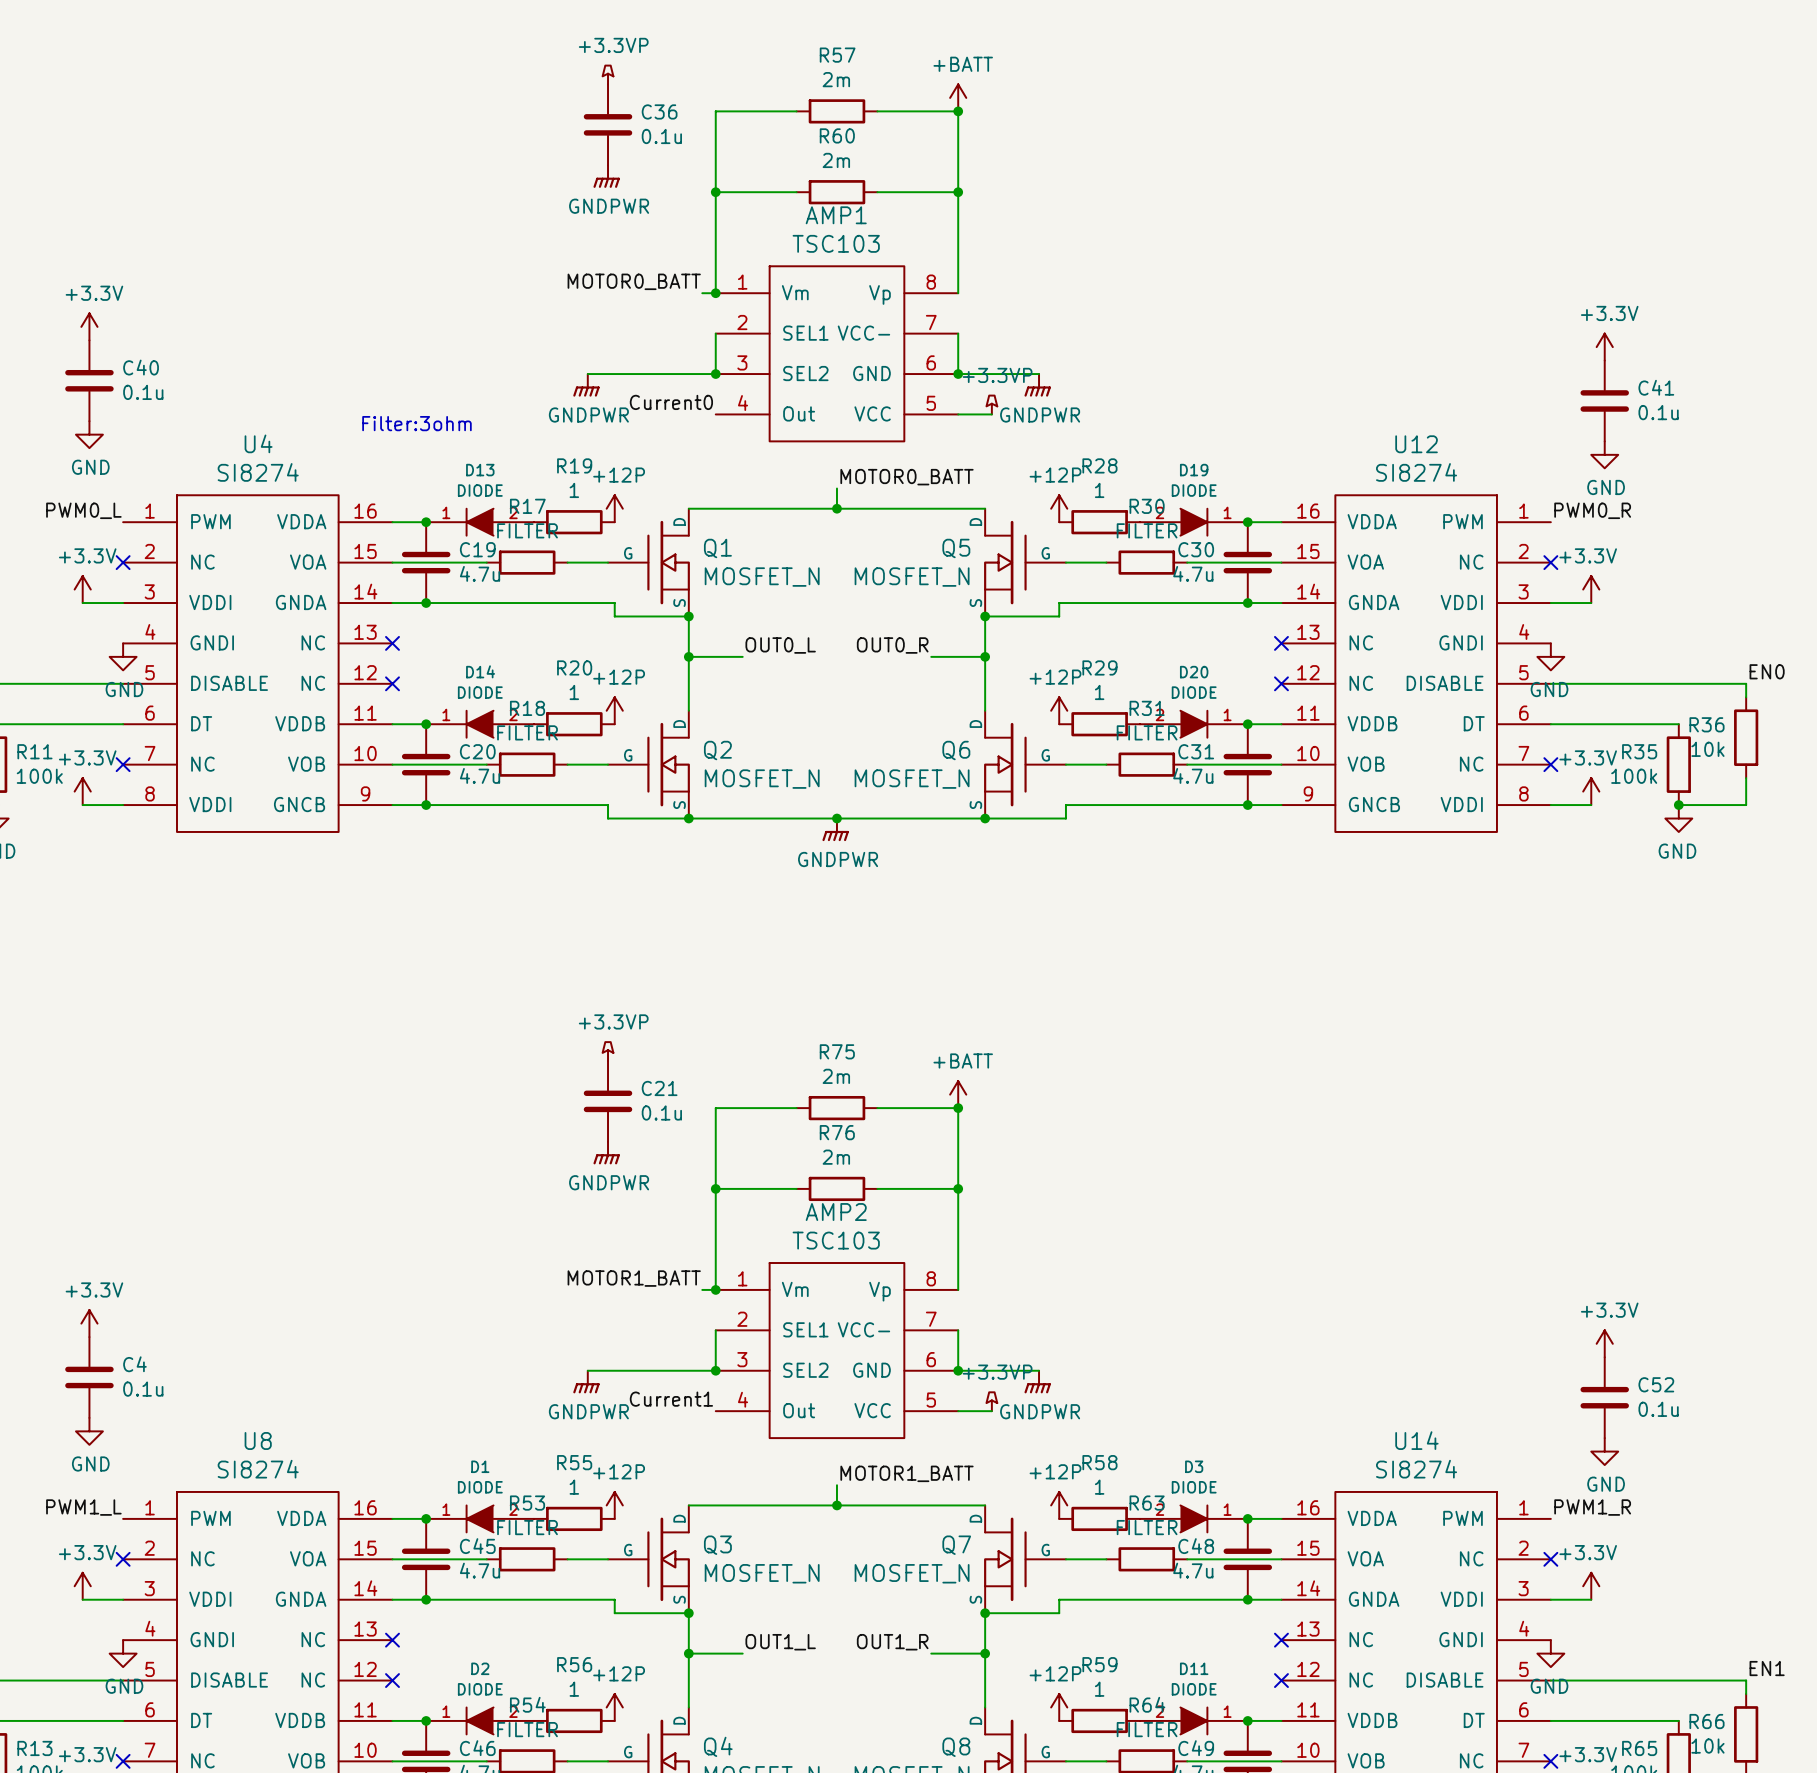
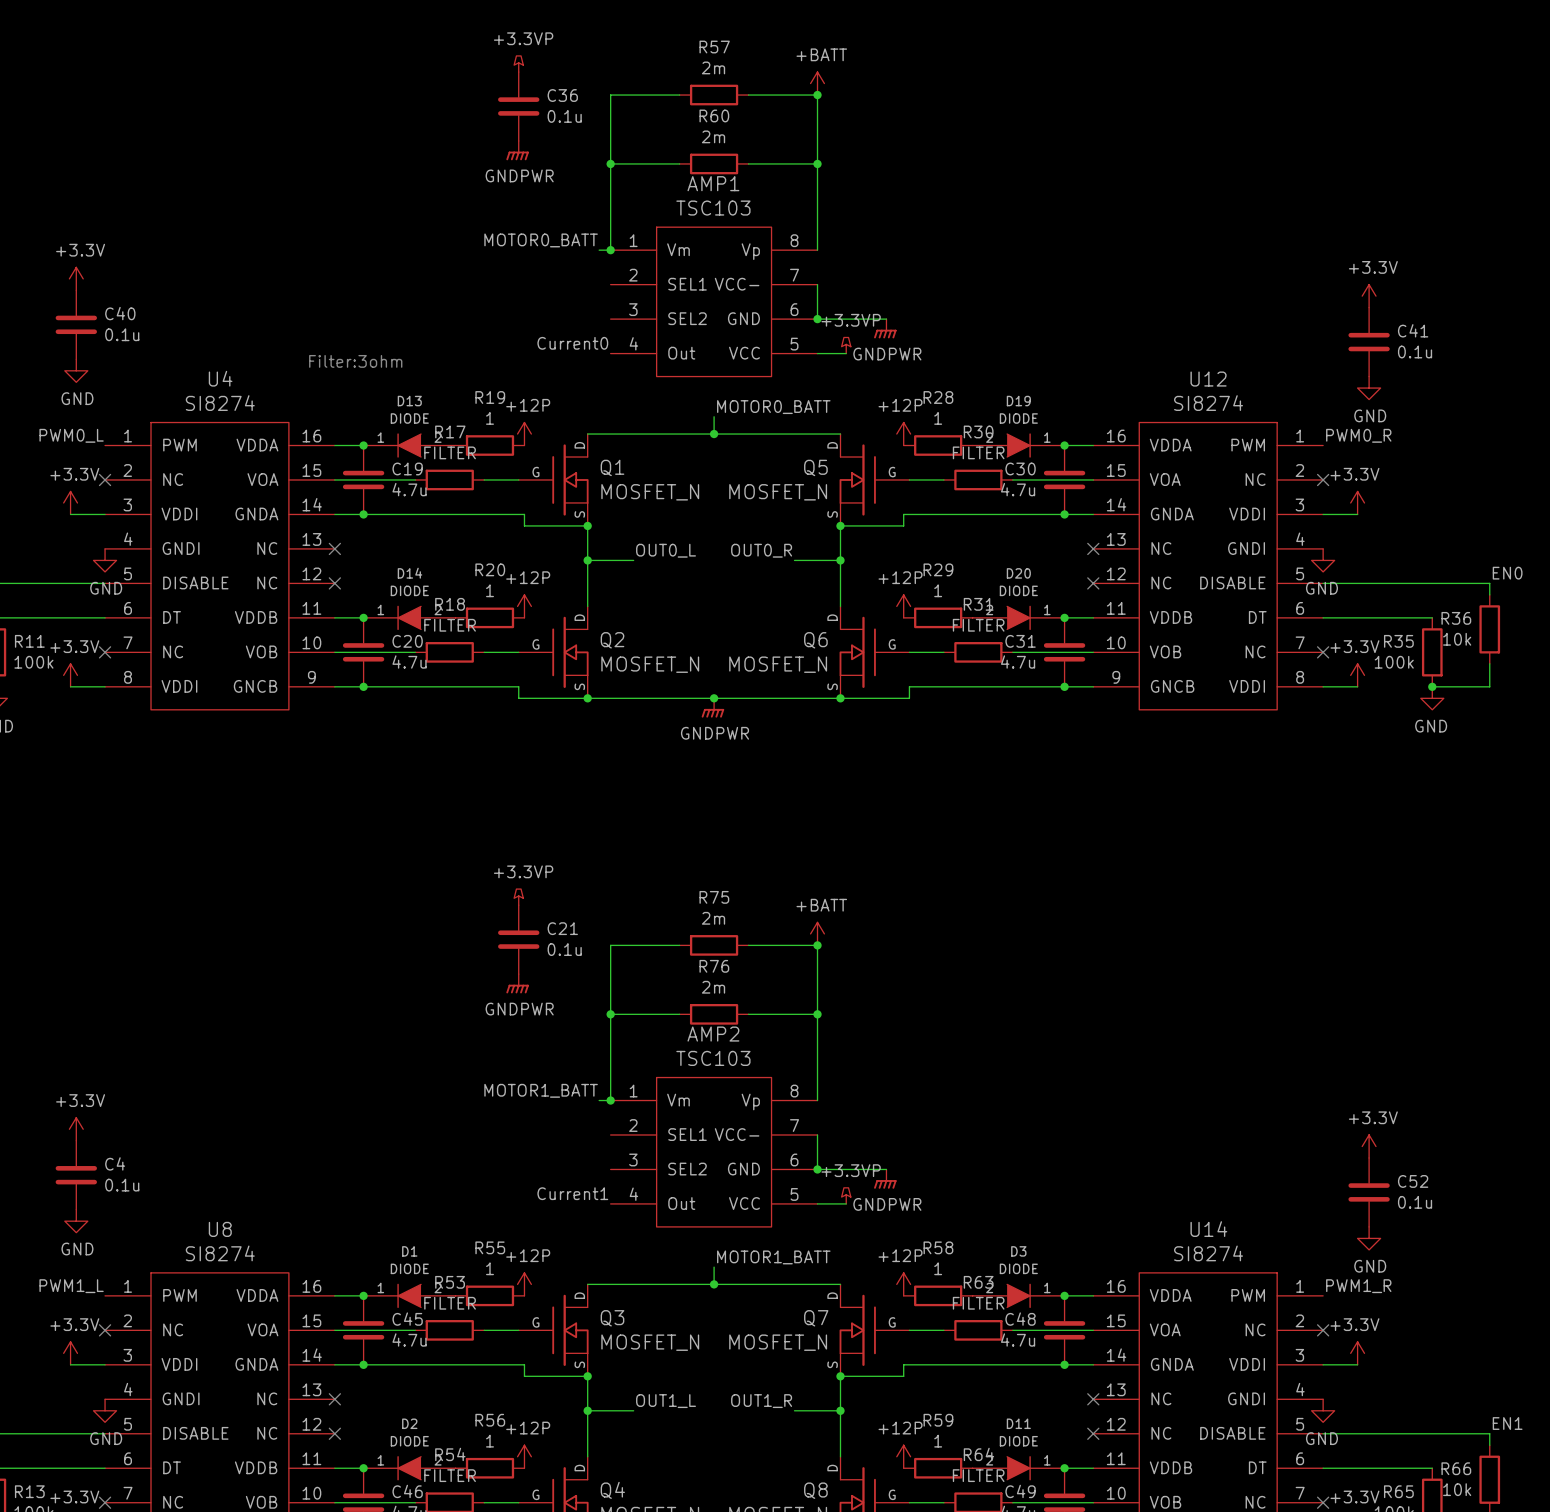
wire: (715, 333) (715, 374) (587, 374) -> none
junction: (715, 374) -> none
power symbol: GNDPWR (586, 385) -> none
wire: (715, 1330) (715, 1370) (587, 1370) -> none
junction: (715, 1370) -> none
power symbol: GNDPWR (586, 1382) -> none

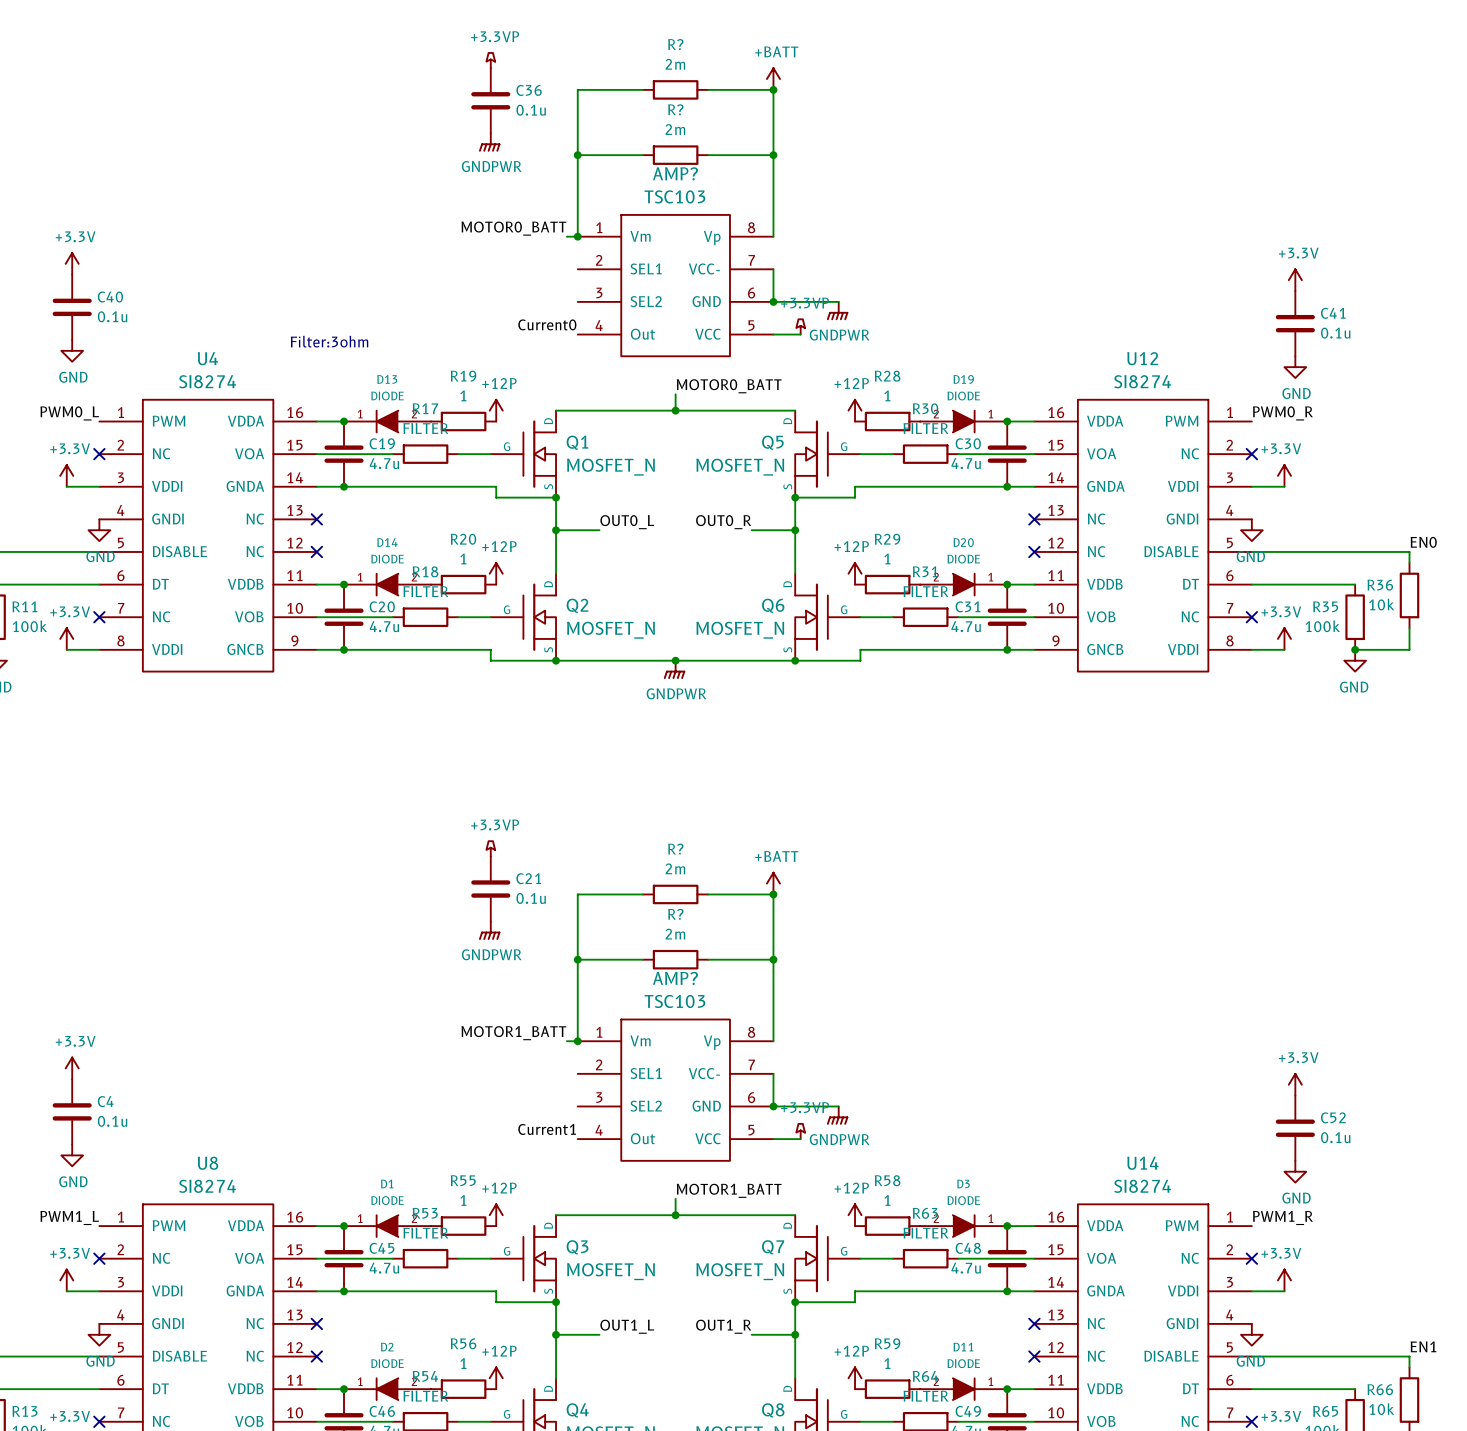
R57 name: R57 (714, 47) -> R? (675, 44)
R60 name: R60 (714, 115) -> R? (675, 109)
AMP1 name: AMP1 (713, 183) -> AMP? (675, 173)
R75 name: R75 (714, 897) -> R? (675, 849)
R76 name: R76 (714, 966) -> R? (675, 914)
AMP2 name: AMP2 (713, 1034) -> AMP? (675, 978)

